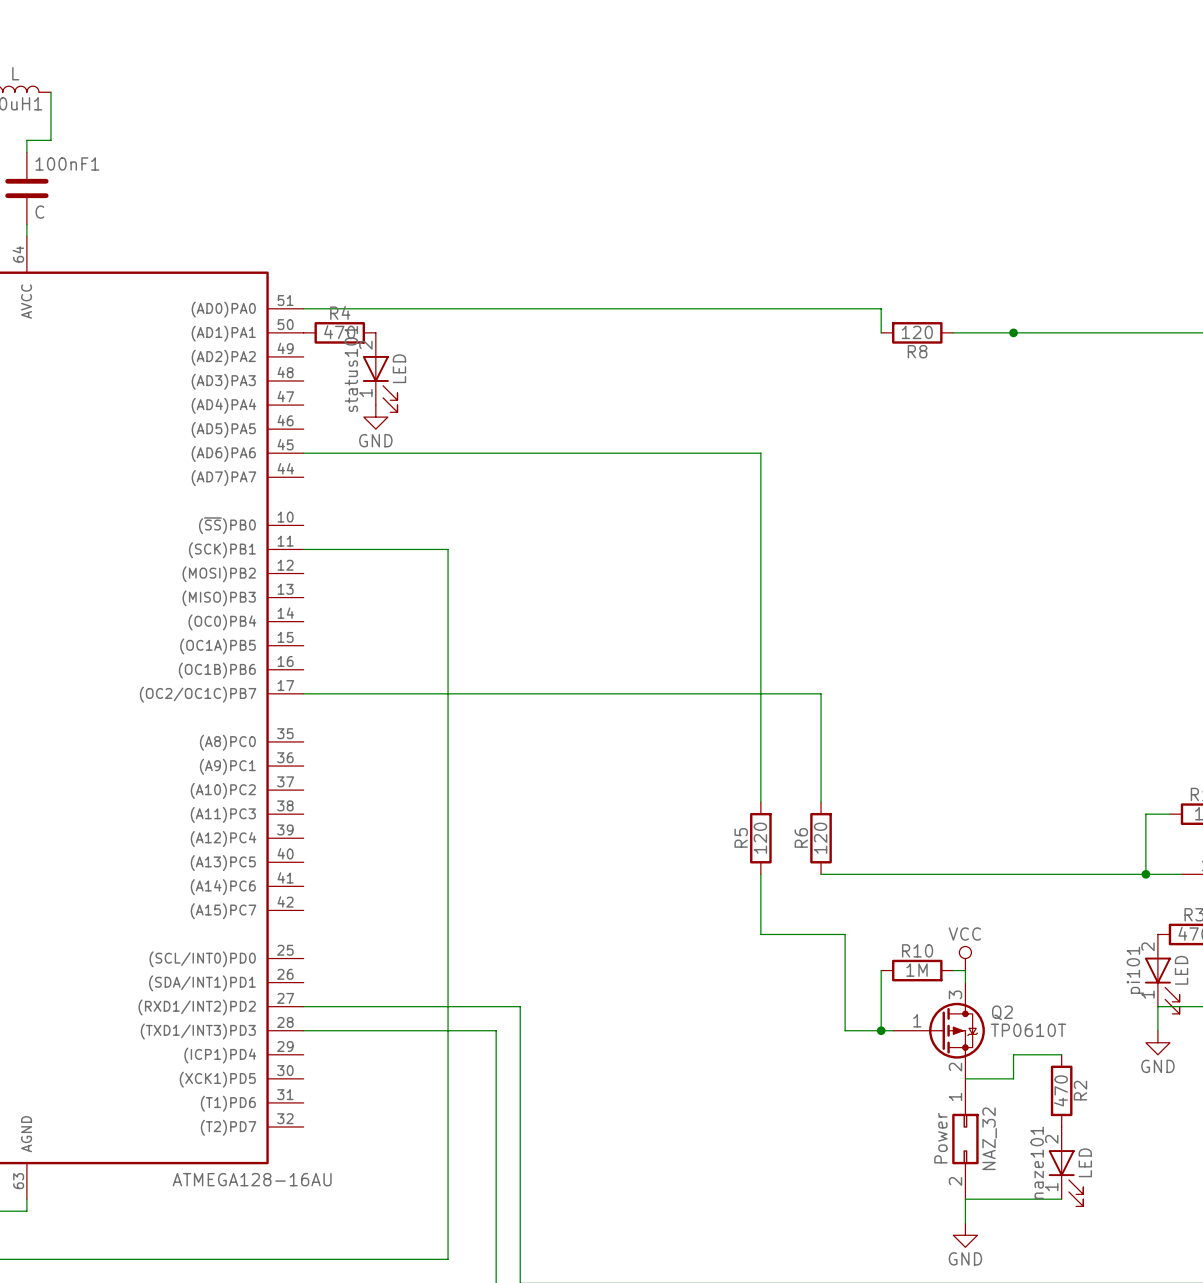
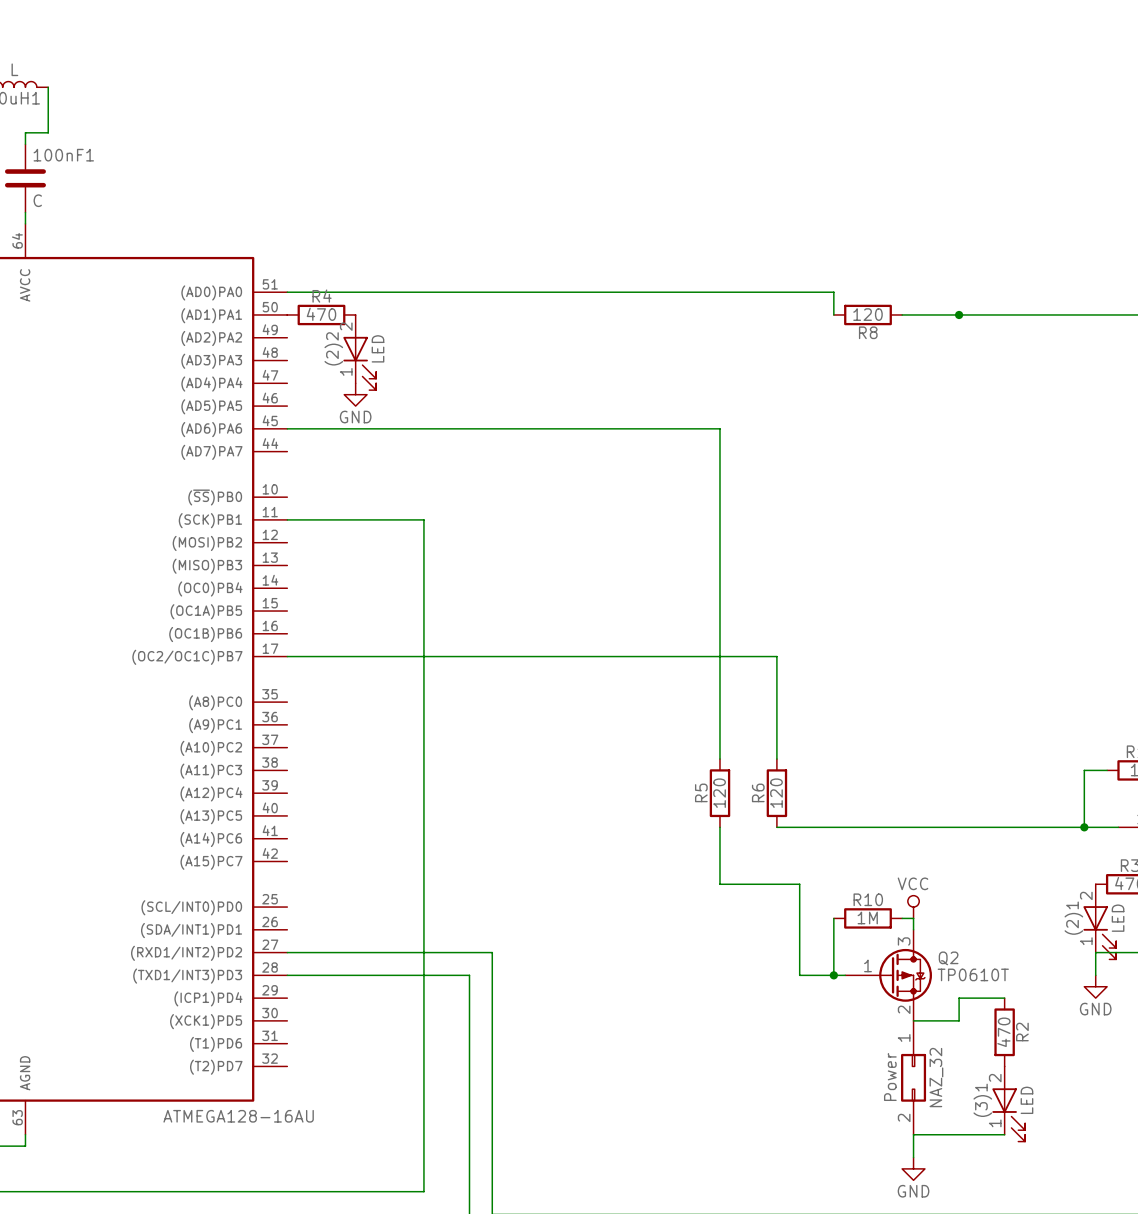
status101 name: status101 (351, 368) -> (2)2 (333, 348)
pi101 name: pi101 (1135, 970) -> (2)1 (1073, 918)
naze101 name: naze101 (1037, 1162) -> (3)1 (982, 1100)

